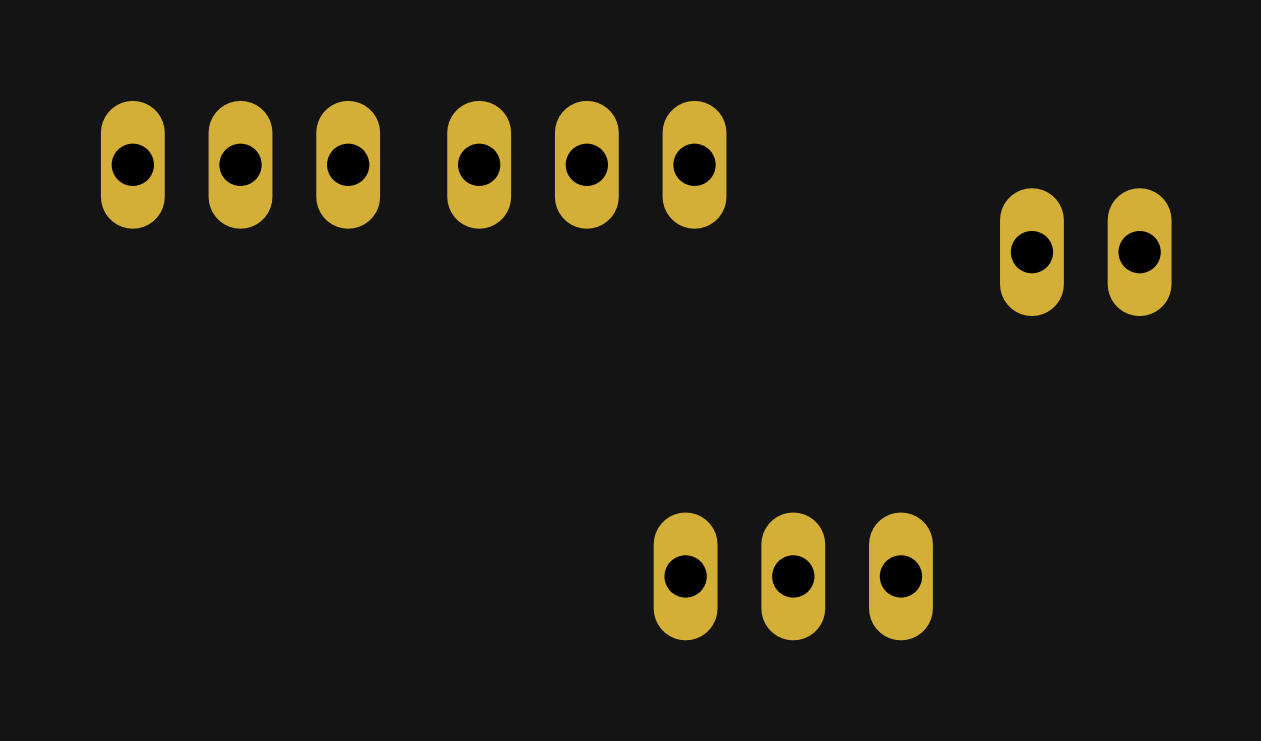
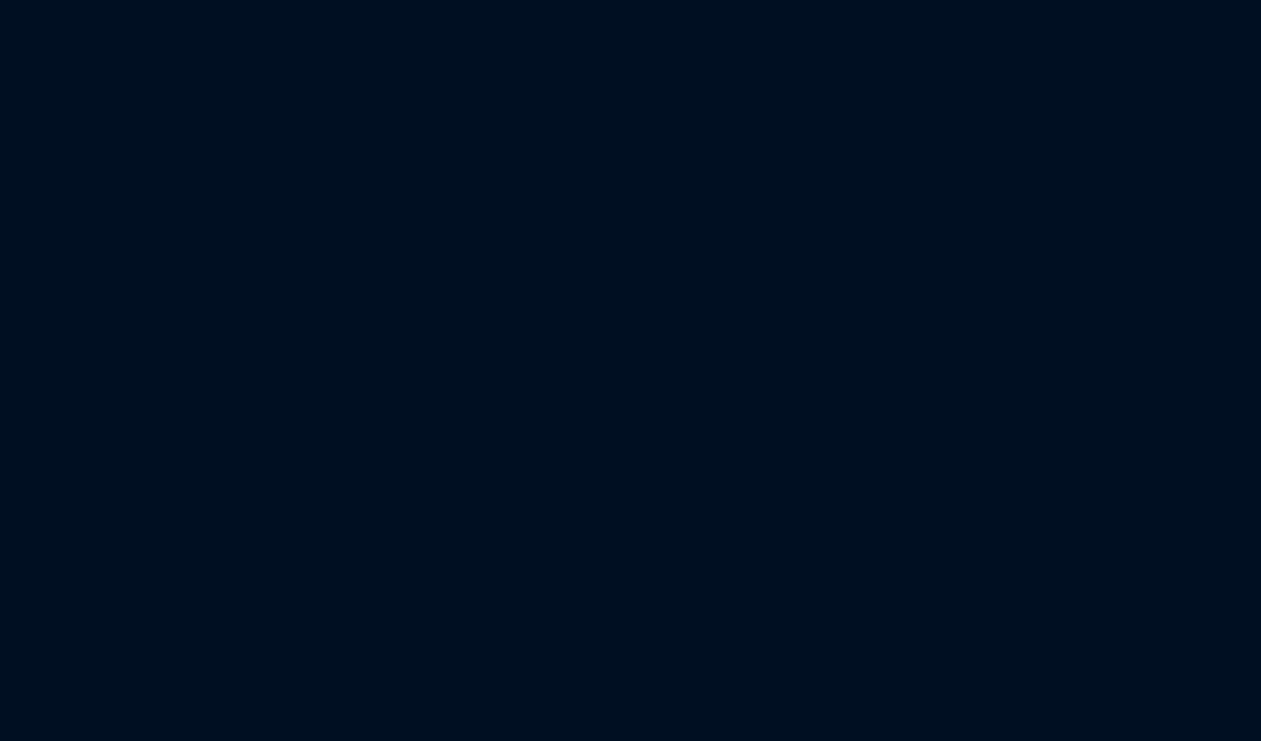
part: (240, 164) -> none
part: (586, 164) -> none
part: (1085, 252) -> none
part: (793, 576) -> none

